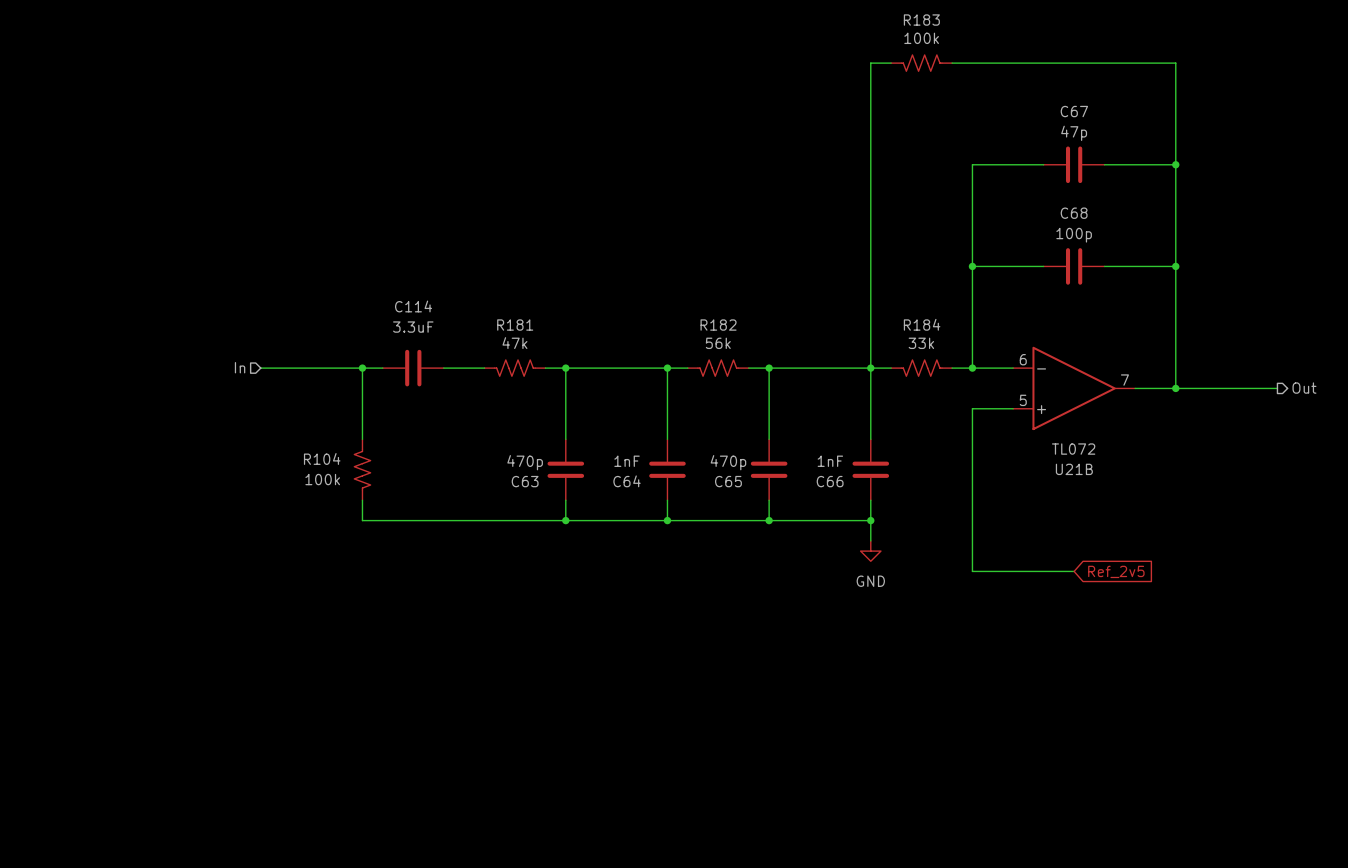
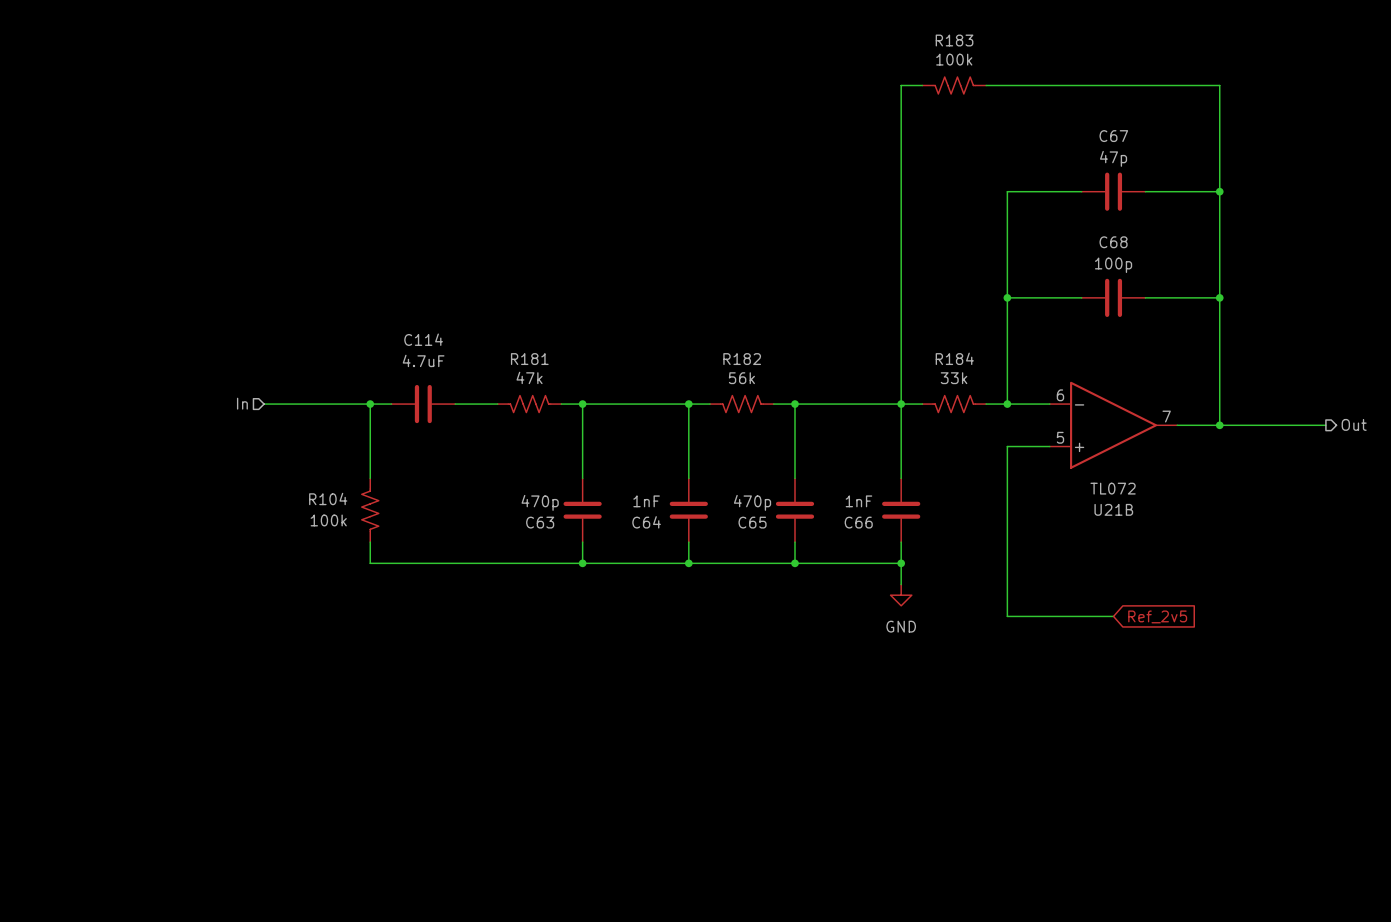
C114 value: 3.3uF (413, 327) -> 4.7uF (423, 360)

